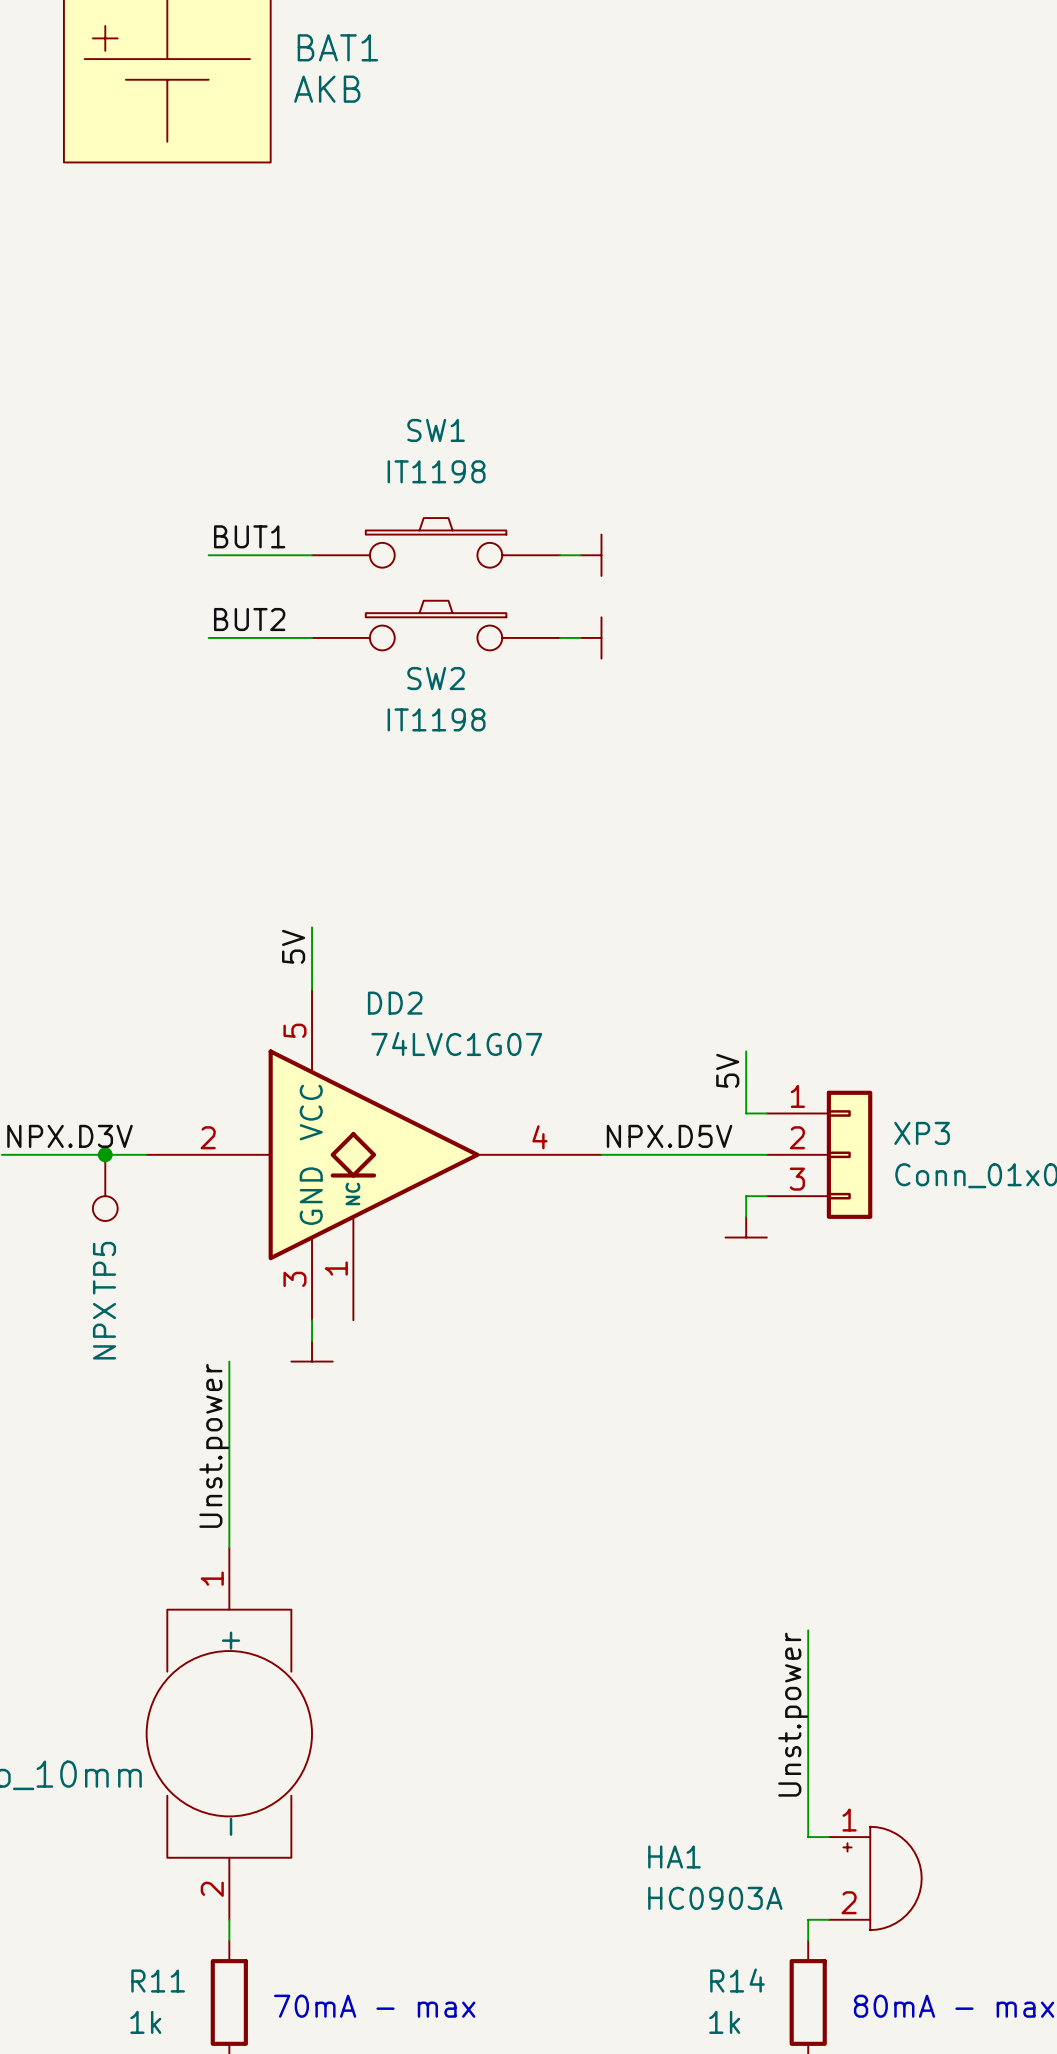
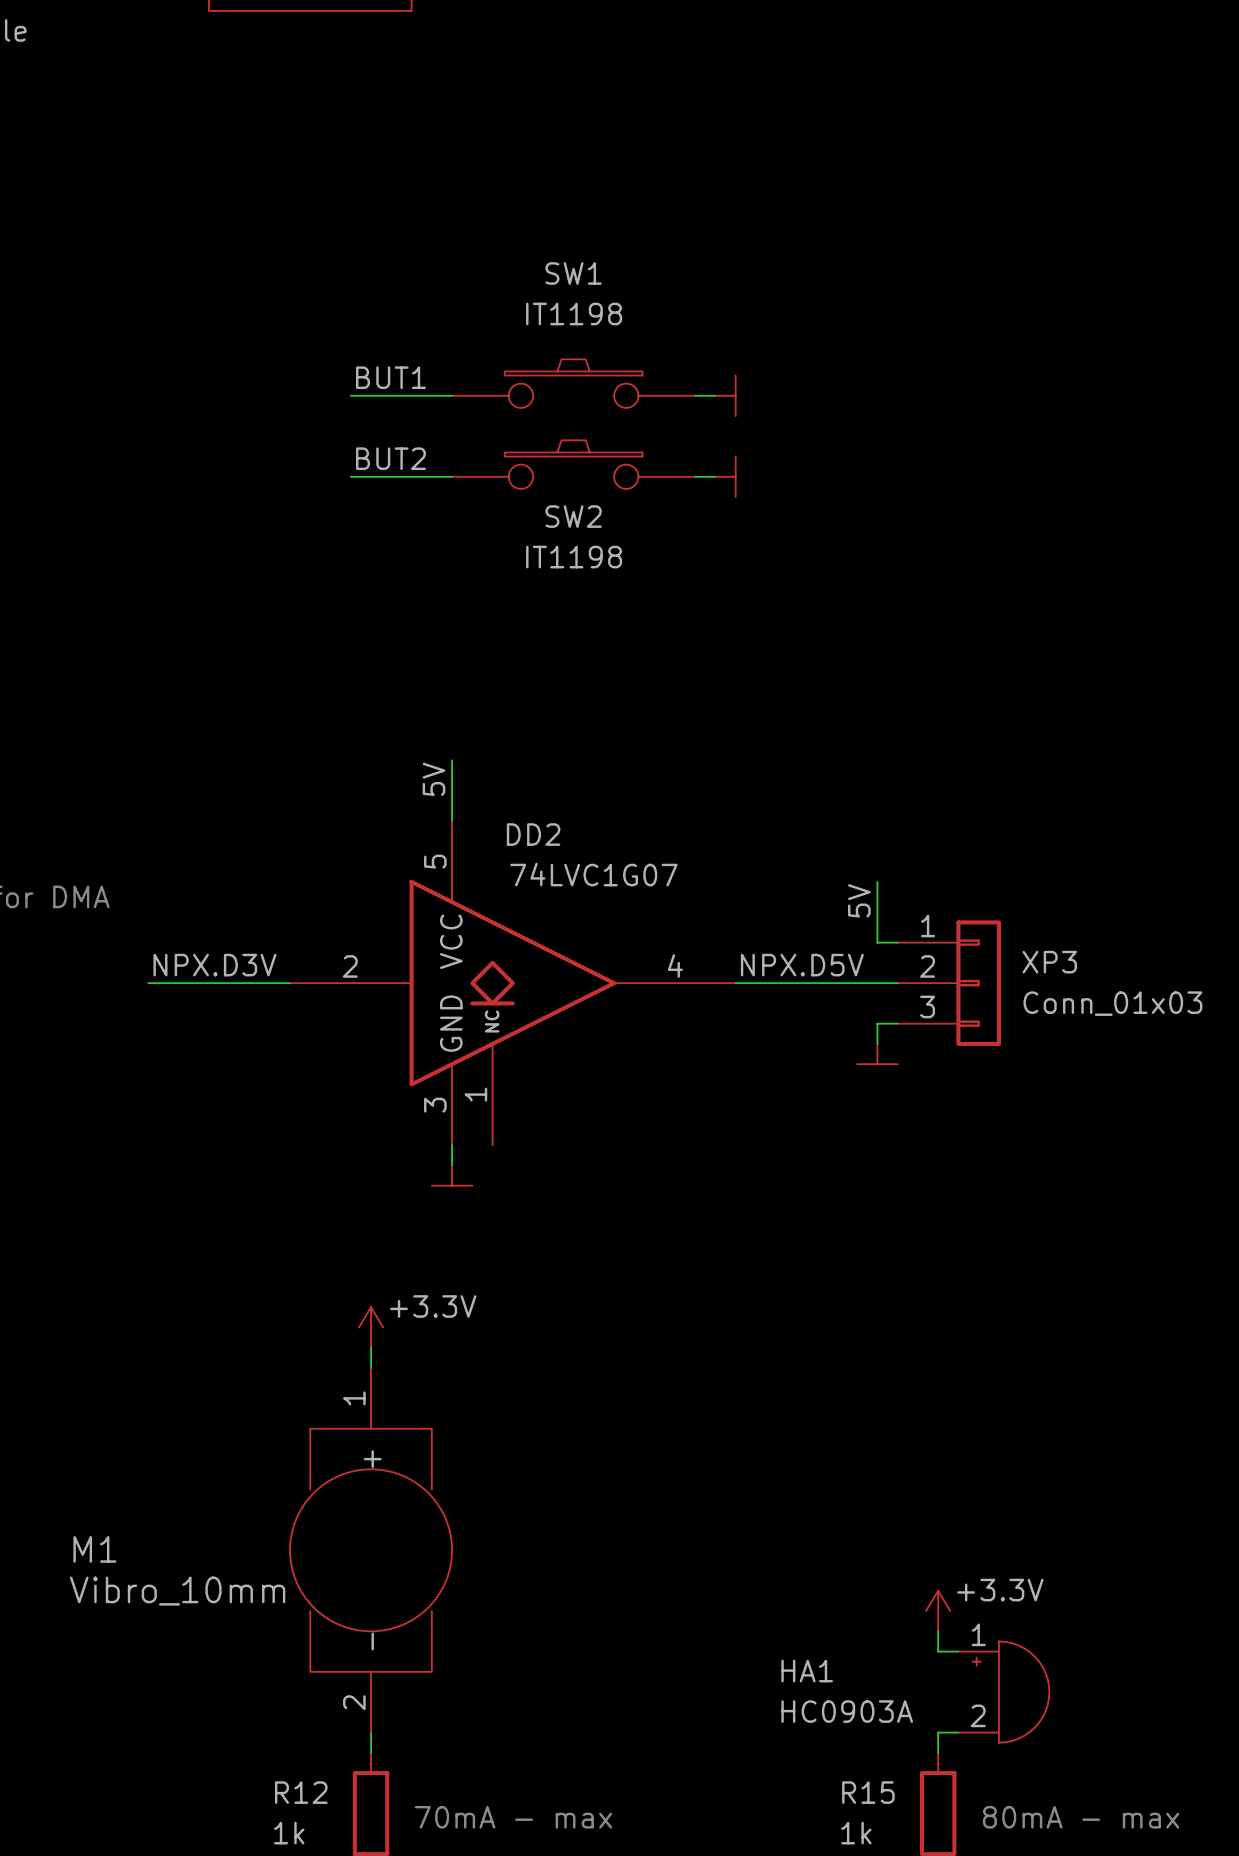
junction: (105, 1154) -> none
TP5: NPX (105, 1187) -> none
wire: (229, 1361) (229, 1526) -> none
label: Unst.power (214, 1445) -> none
power symbol: none -> +3.3V (371, 1327)
wire: (808, 1630) (808, 1816) -> none
label: Unst.power (793, 1714) -> none
power symbol: none -> +3.3V (938, 1611)
R14 name: R14 (737, 1980) -> R15 (868, 1792)
R11 name: R11 (158, 1981) -> R12 (301, 1792)

